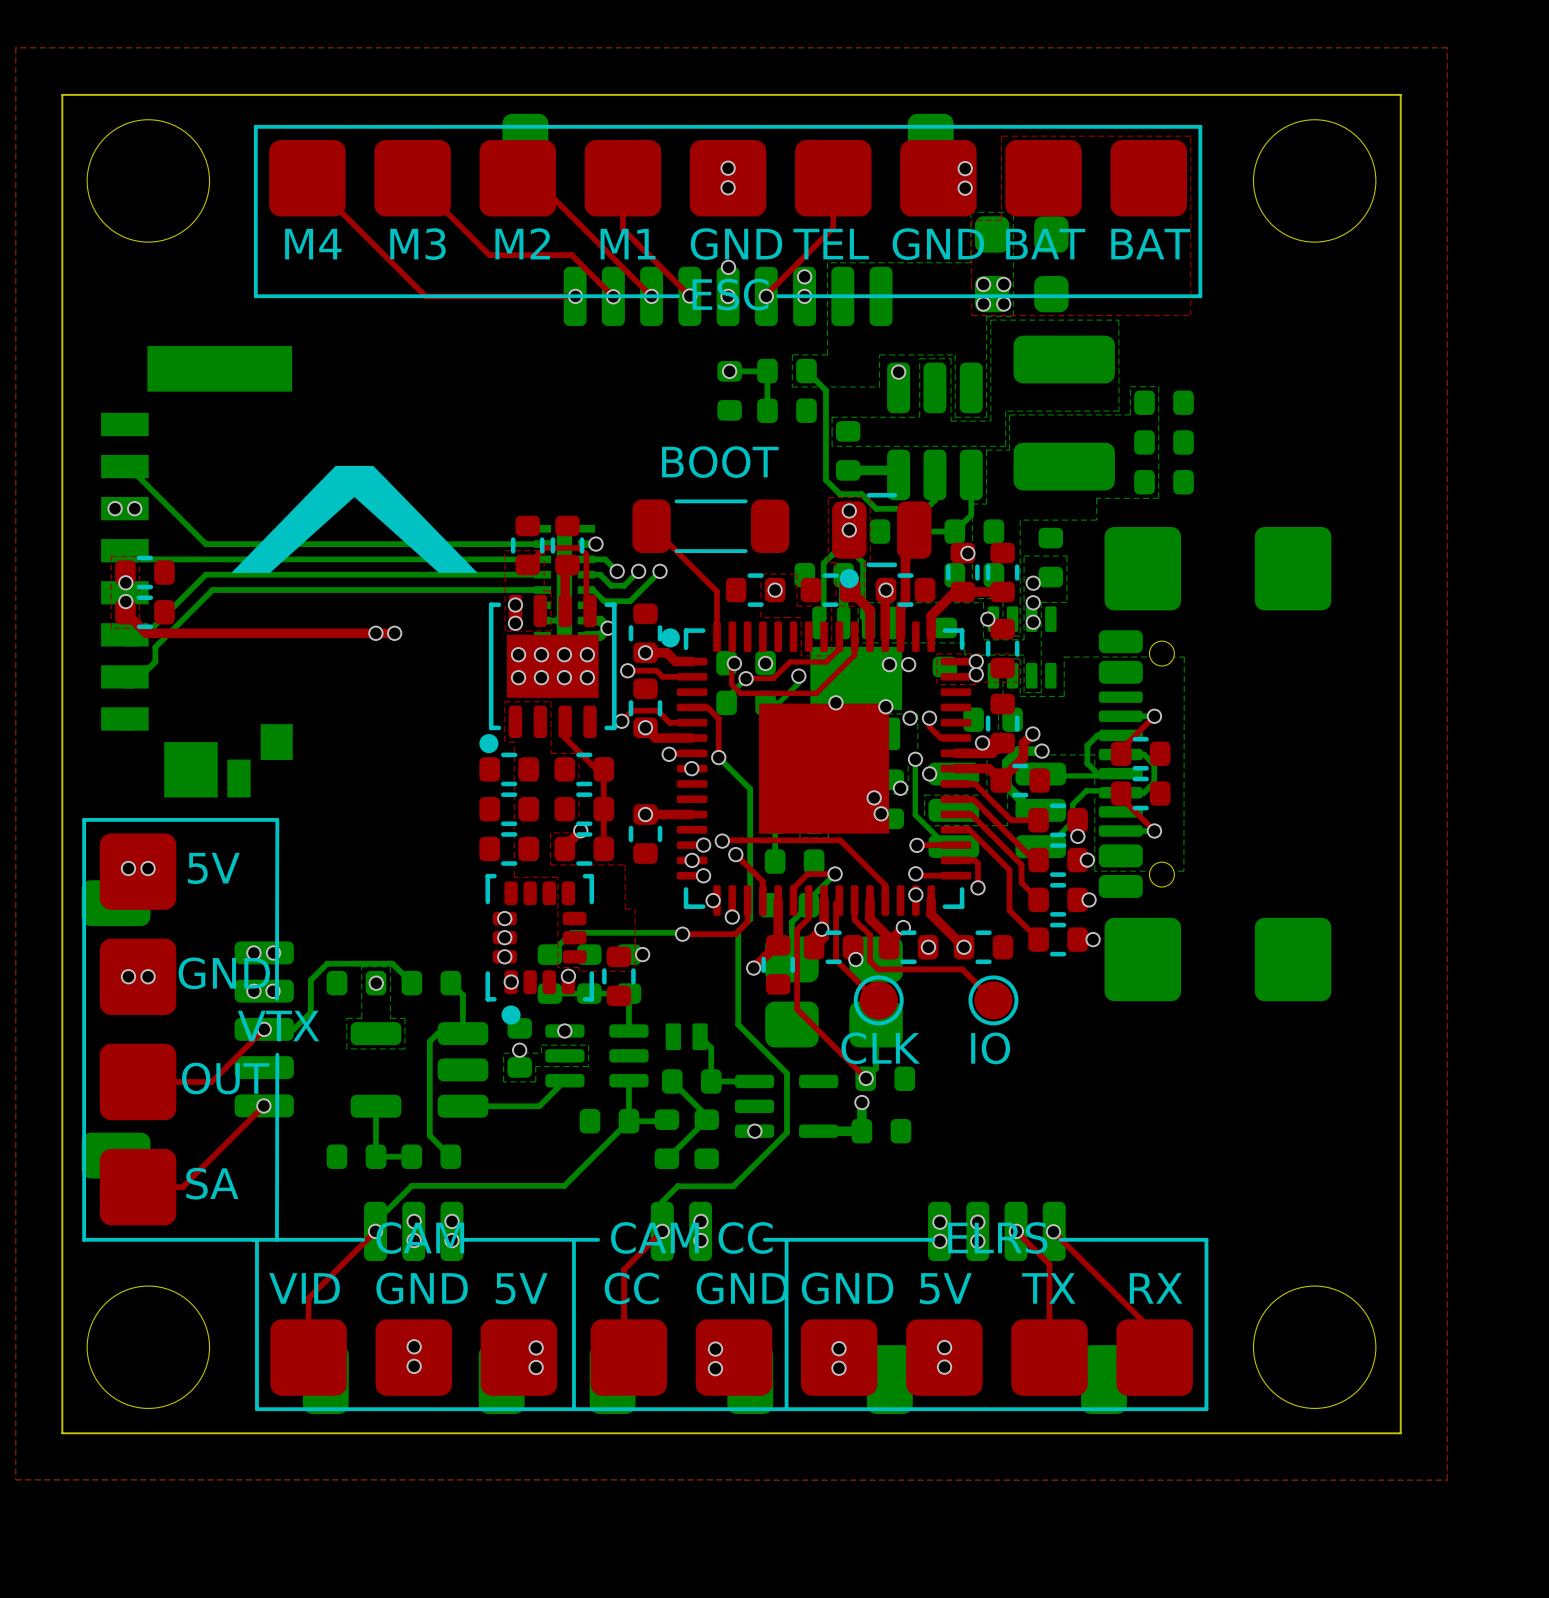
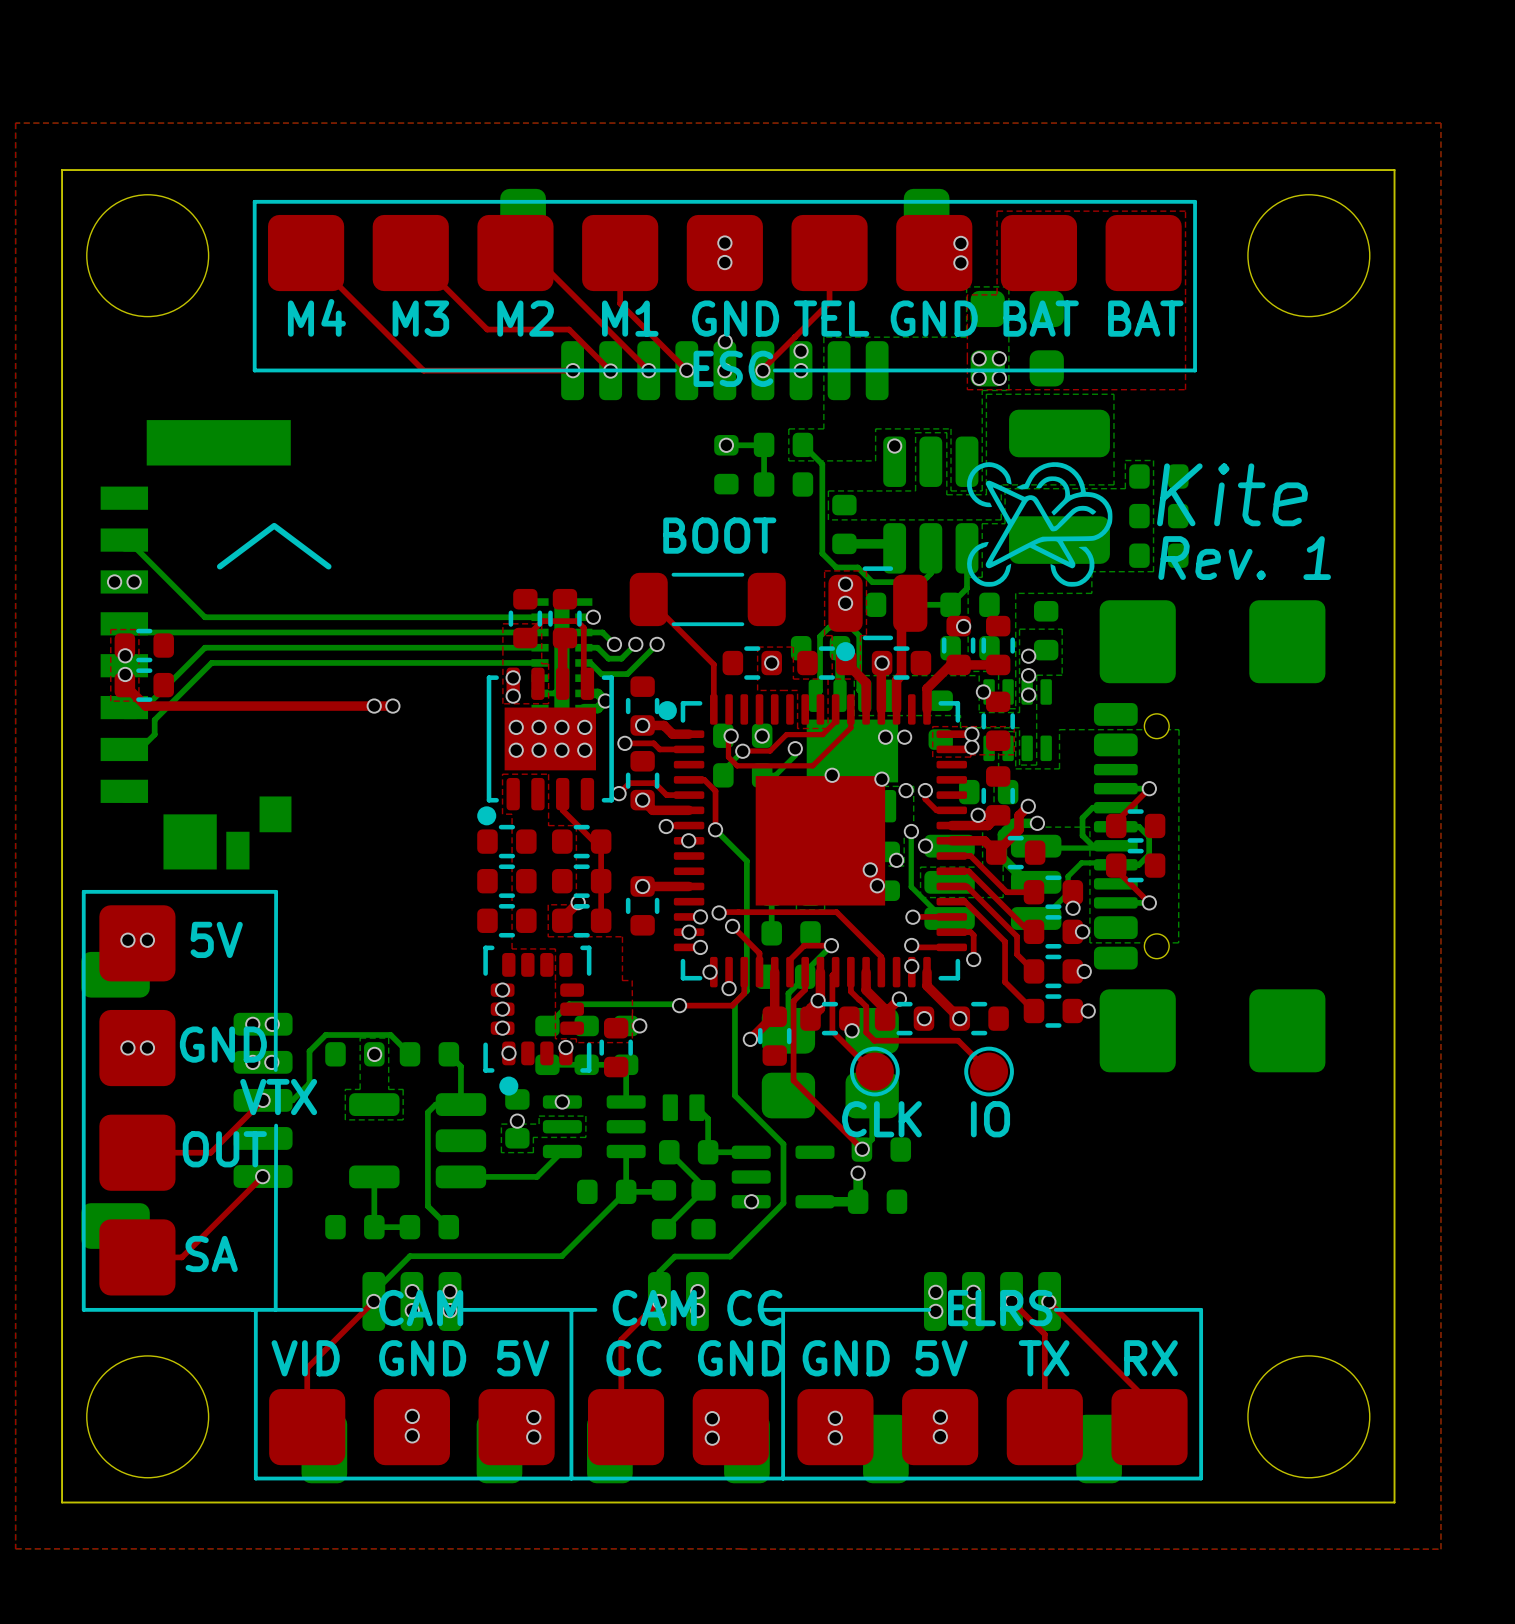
drawing: none -> [966, 462, 1113, 587]
text: none -> Kite (1232, 494)
text: none -> Rev. 1 (1244, 558)

